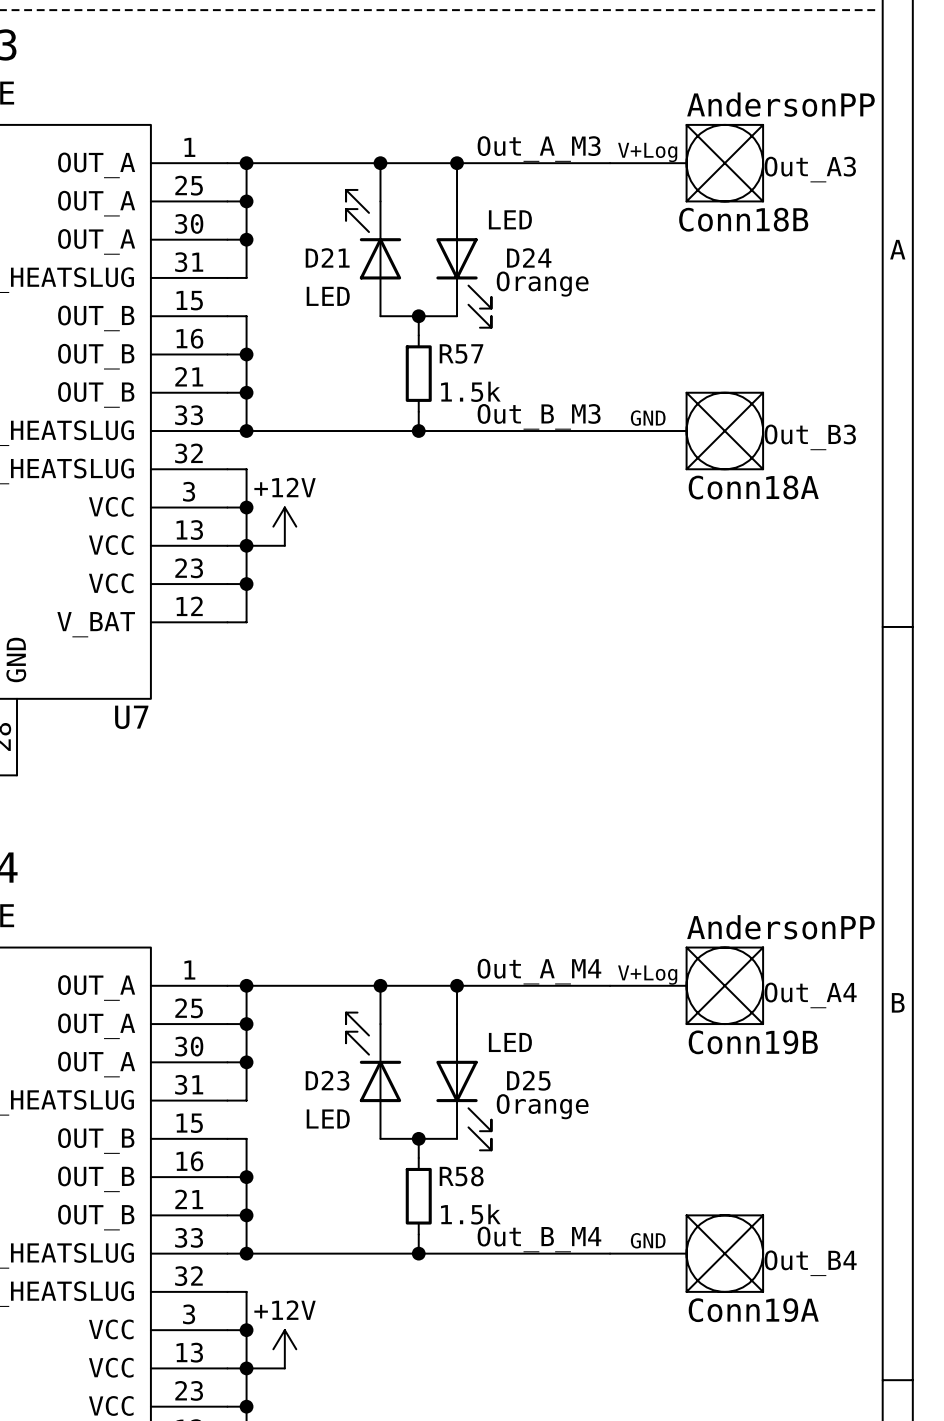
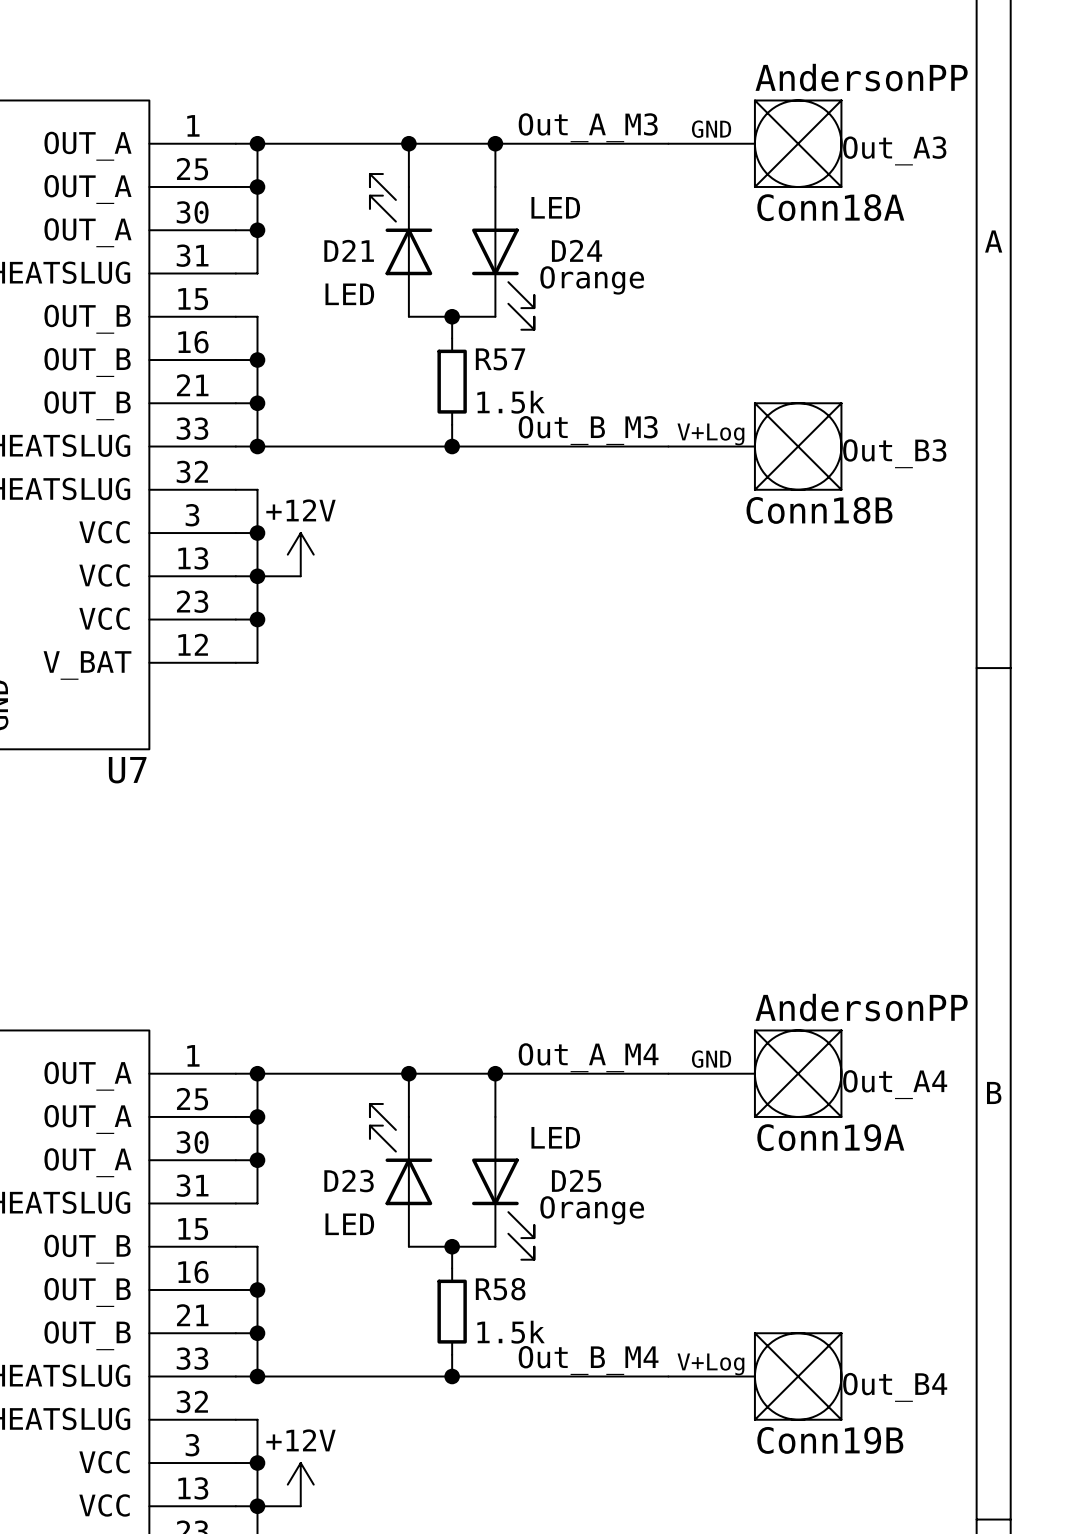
Conn18B position: (686, 163) -> (754, 446)
Conn18A position: (686, 431) -> (754, 143)
Conn19B position: (686, 985) -> (754, 1376)
Conn19A position: (686, 1253) -> (754, 1073)

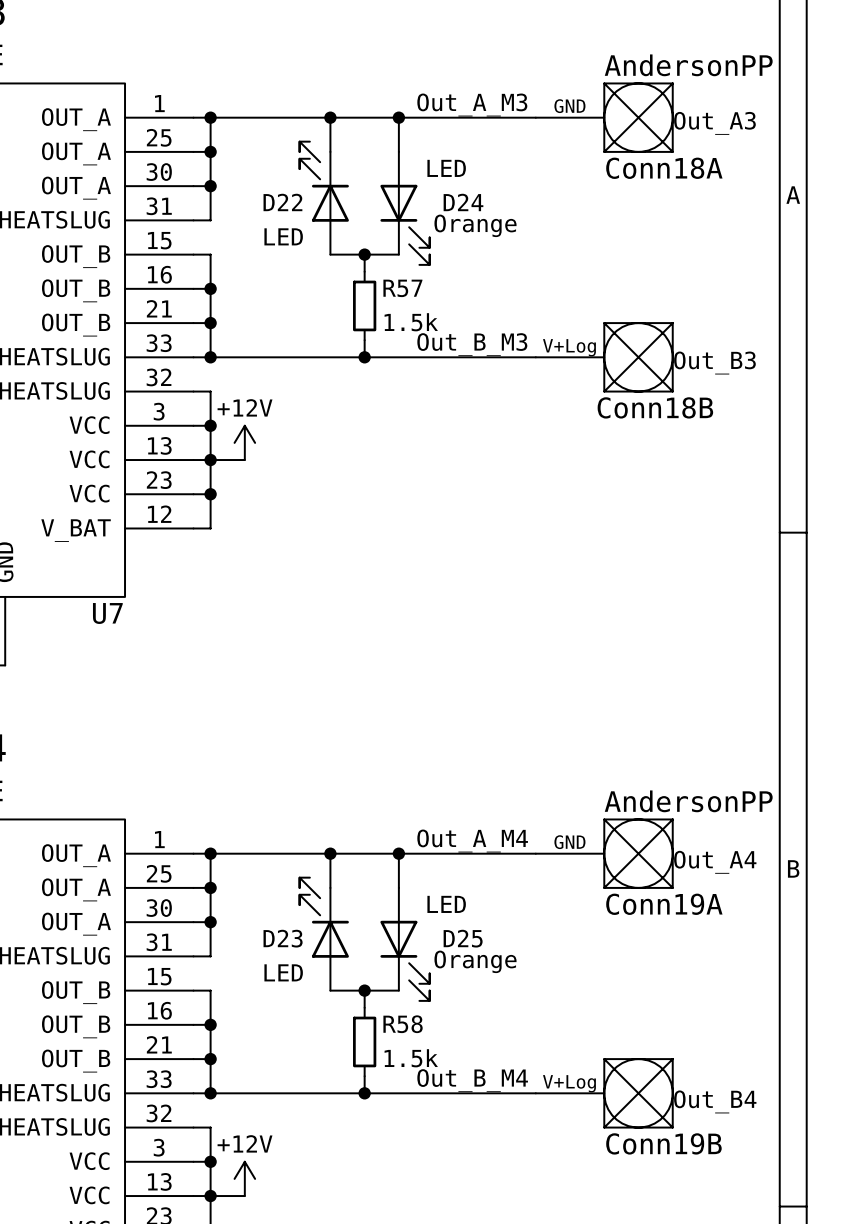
D21 name: D21 (349, 250) -> D22 (282, 202)

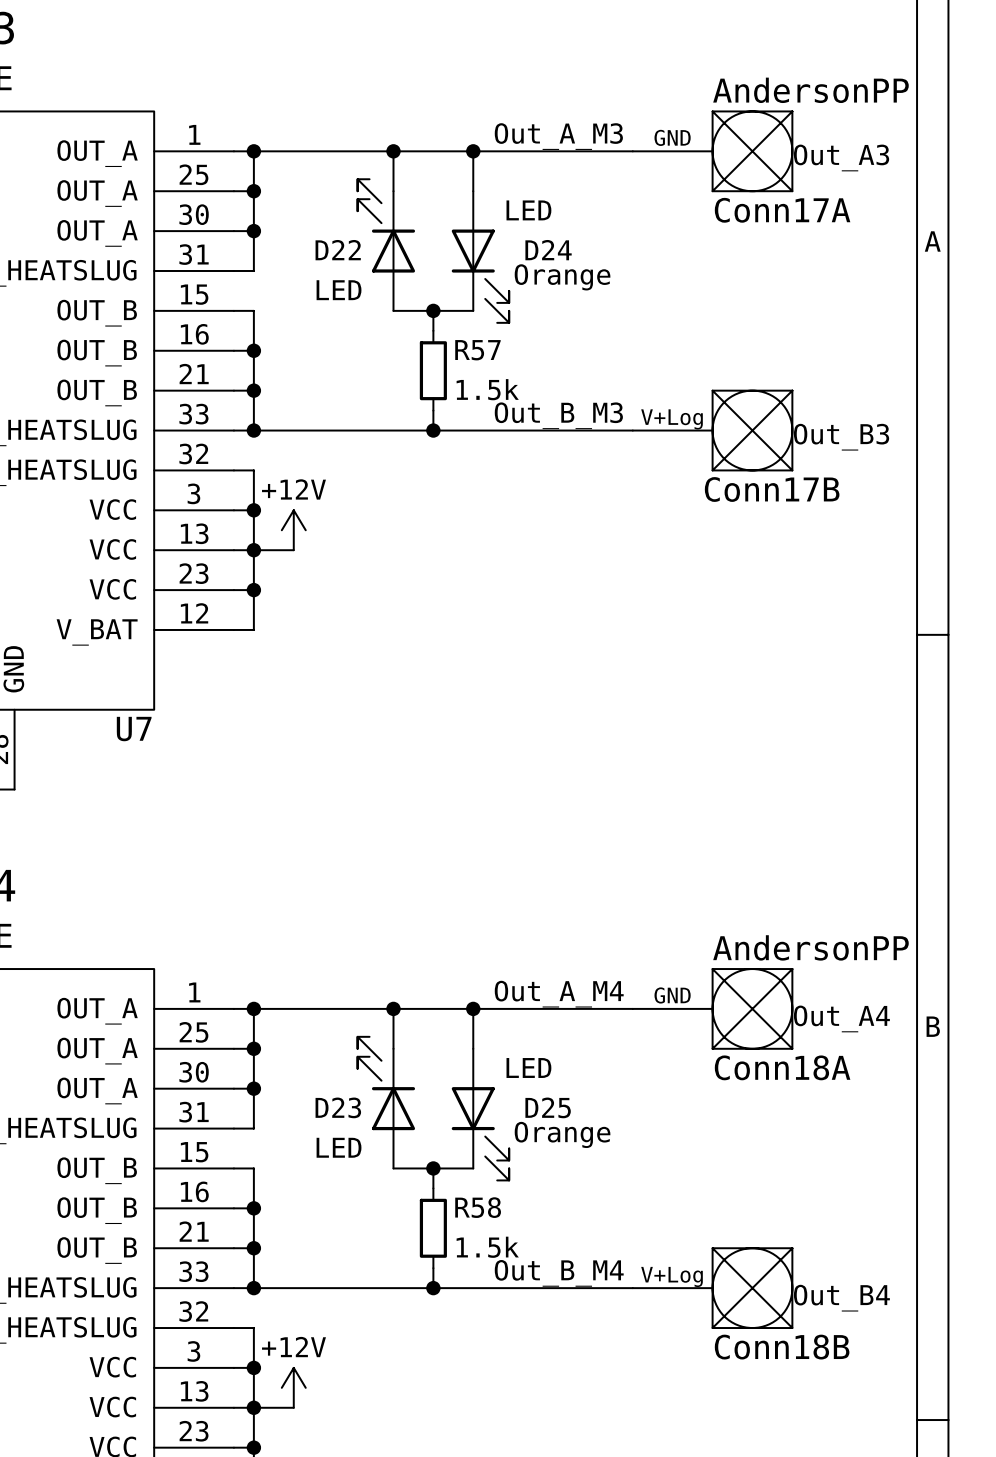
Conn18A name: Conn18A (664, 168) -> Conn17A (782, 210)
Conn18B name: Conn18B (655, 407) -> Conn17B (772, 489)
Conn19A name: Conn19A (664, 904) -> Conn18A (782, 1067)
Conn19B name: Conn19B (663, 1143) -> Conn18B (782, 1347)

